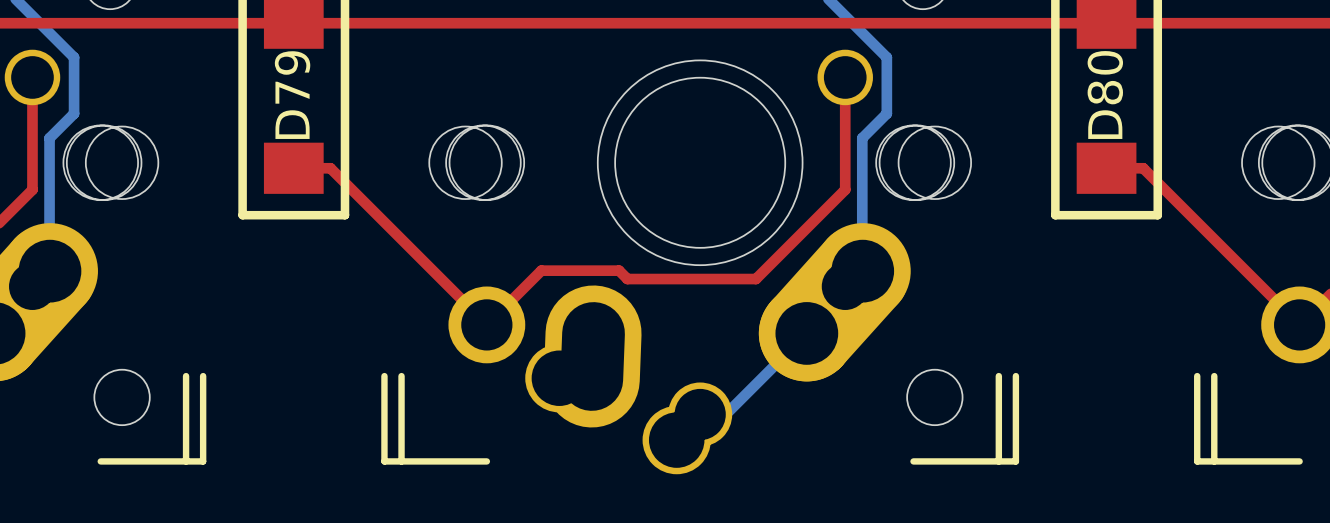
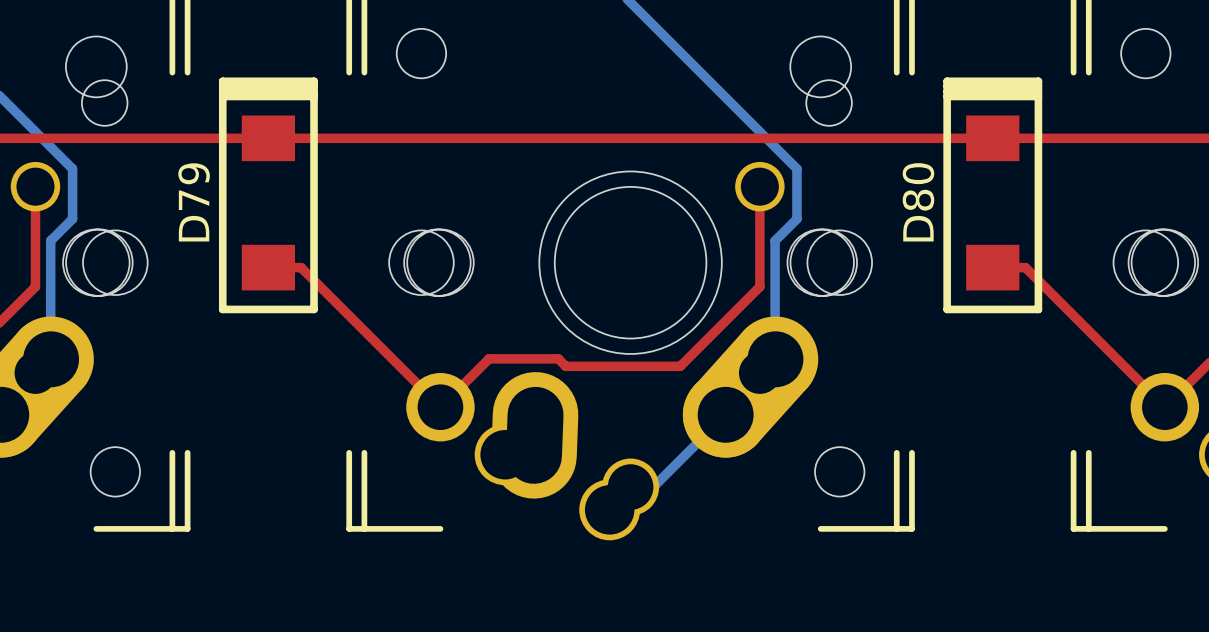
D79 name position: D79 (292, 95) -> D79 (194, 202)
D80 name position: D80 (1105, 95) -> D80 (918, 202)

